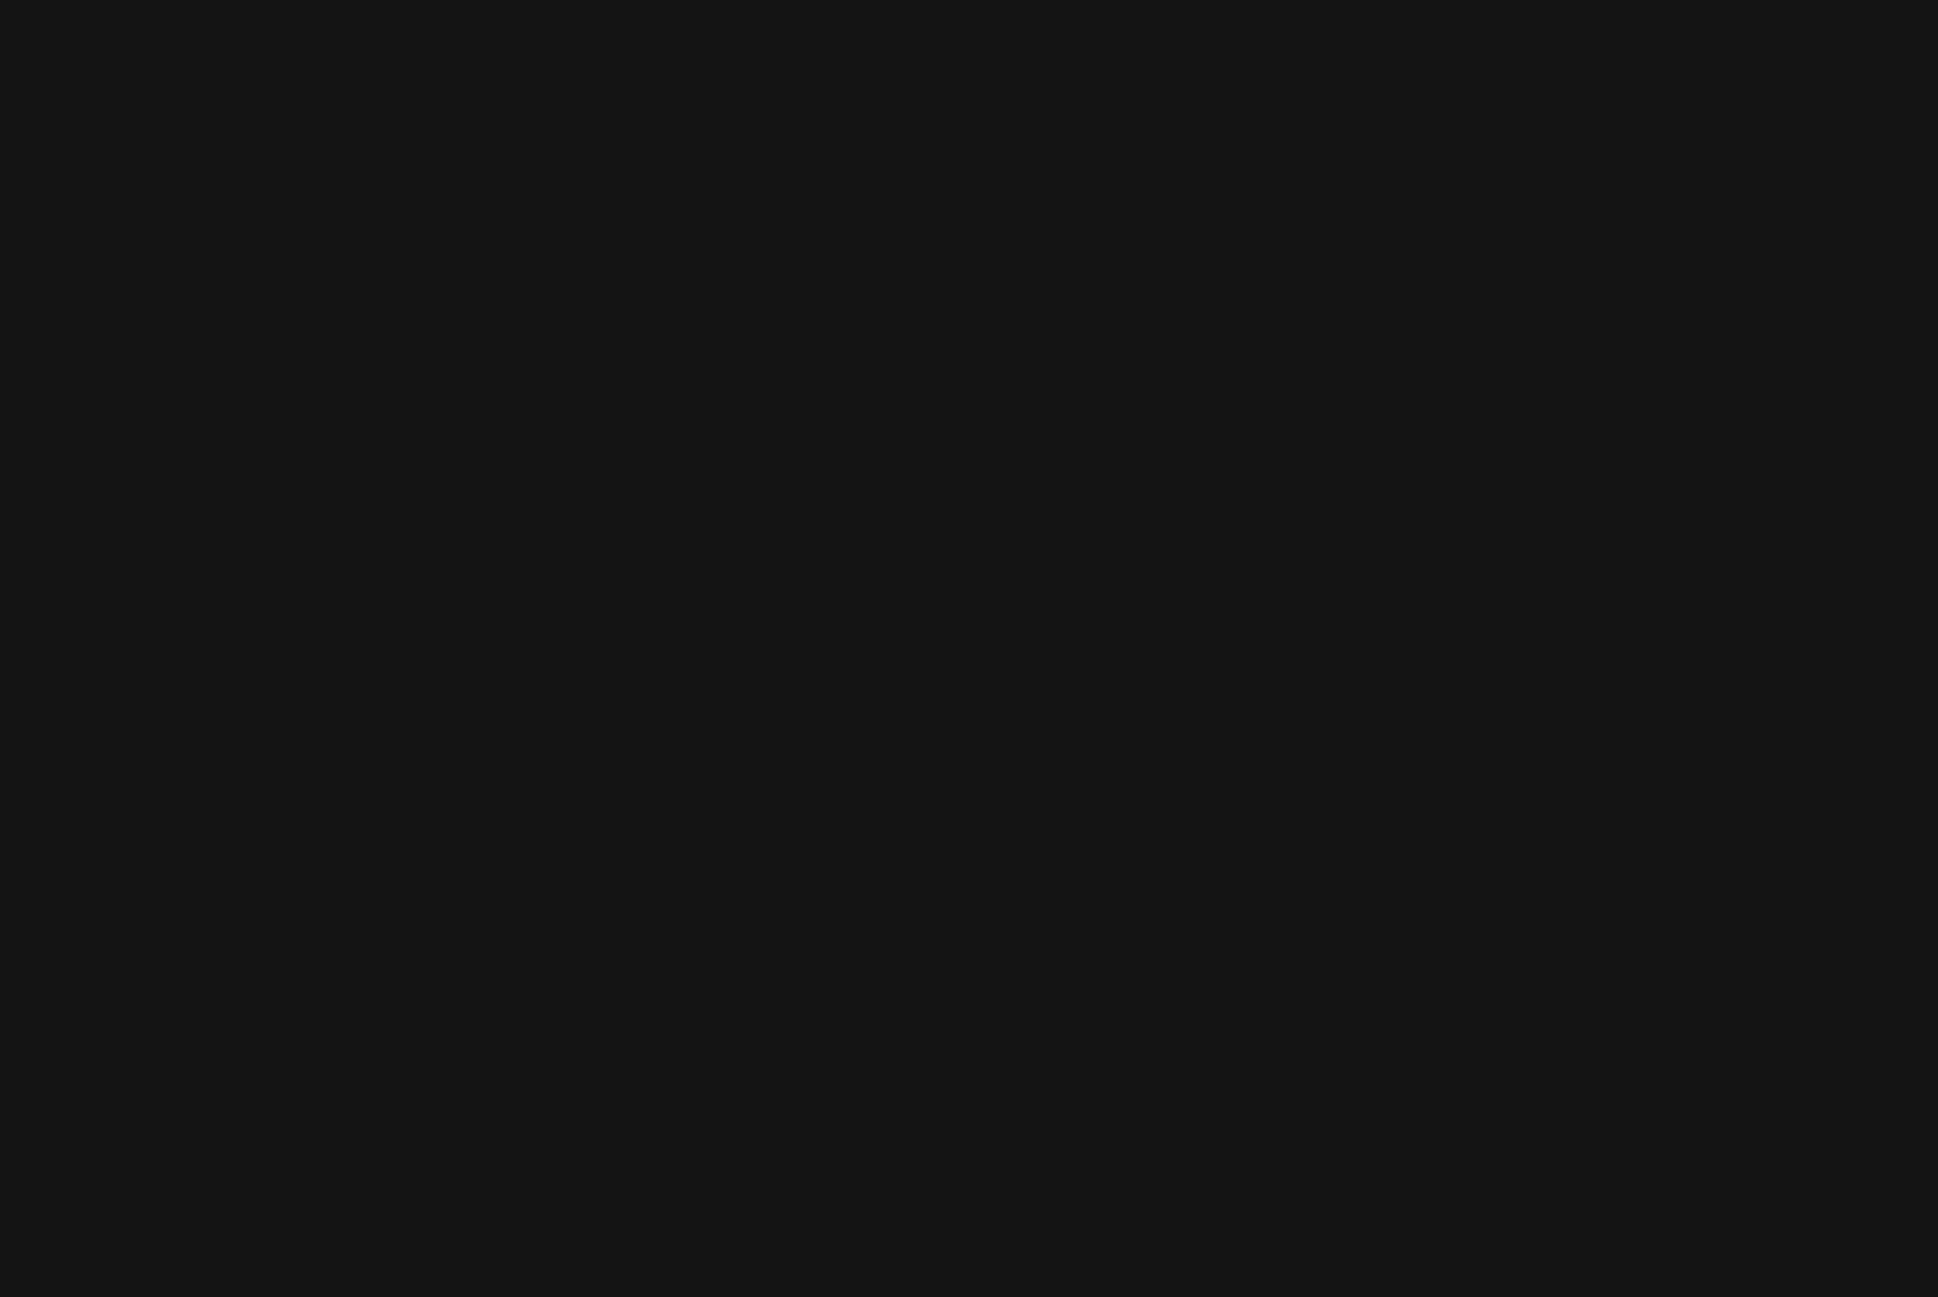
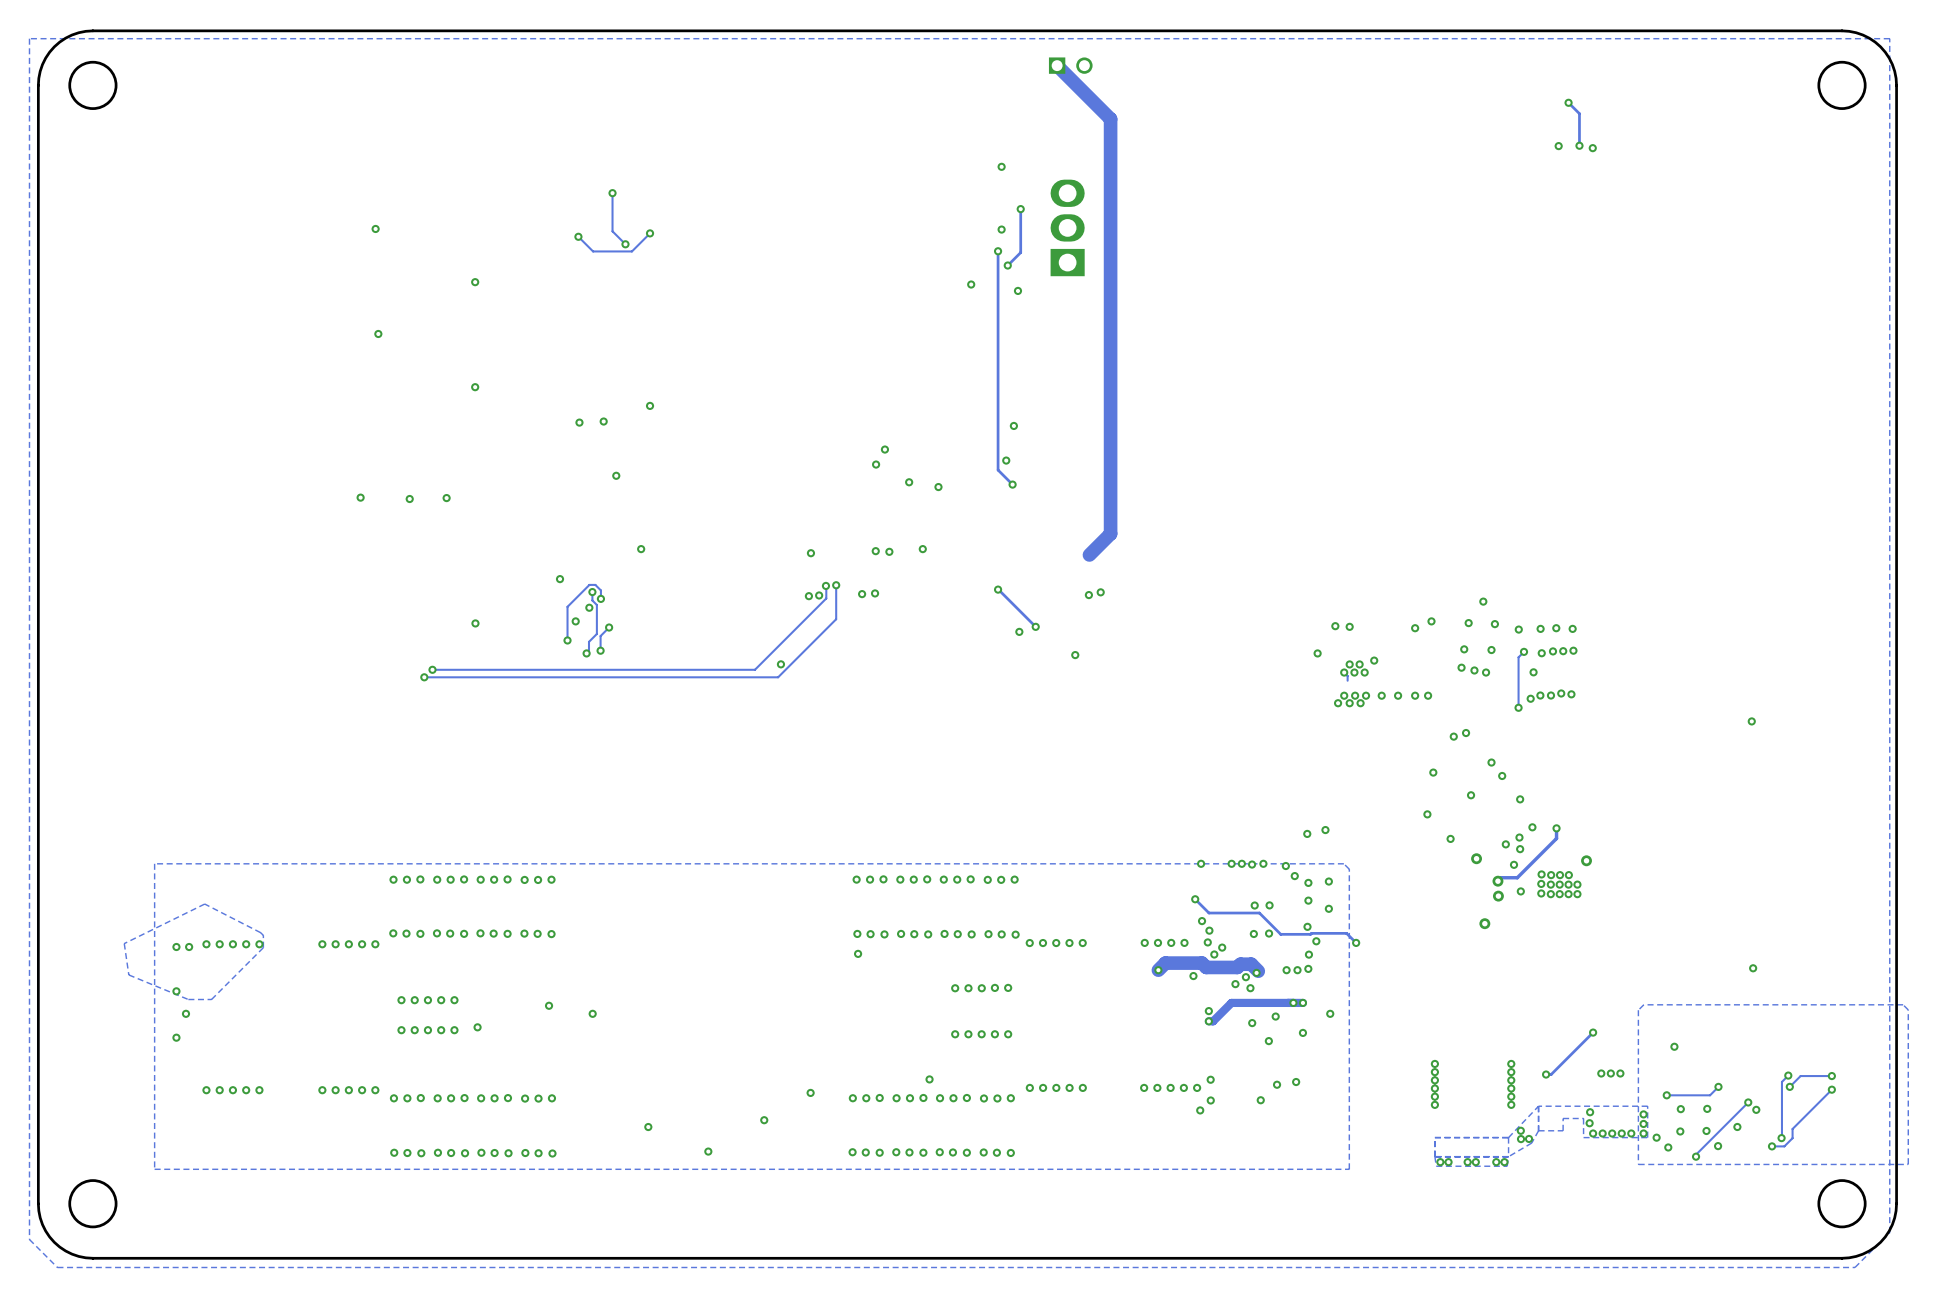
board edge: none -> (1842, 30) (92, 30) (72, 35) (59, 42) (45, 58) (40, 71) (38, 85) (38, 1203) (40, 1217) (49, 1236) (65, 1250) (78, 1256) (92, 1258) (1842, 1258) (1856, 1256) (1875, 1247) (1885, 1236) (1892, 1224) (1896, 1203) (1896, 85) (1892, 64) (1880, 46) (1862, 35) (1842, 30)
zone outline: none -> (1889, 38) (29, 38) (29, 1239) (57, 1267) (1854, 1267) (1889, 1232) (1889, 38)
round board edge: none -> [68, 60, 118, 110]
round board edge: none -> [1817, 60, 1867, 110]
track: none -> (1057, 65) (1110, 119) (1110, 533) (1089, 554)
part: none -> (1070, 65)
track: none -> (1568, 102) (1579, 113) (1579, 145)
via: none -> (1568, 102)
via: none -> (1579, 145)
via: none -> (1558, 146)
via: none -> (1592, 148)
via: none -> (1001, 166)
track: none -> (612, 193) (612, 231) (625, 244)
via: none -> (612, 193)
track: none -> (1020, 209) (1020, 252) (1007, 265)
via: none -> (1020, 209)
part: none -> (1067, 227)
via: none -> (375, 228)
via: none -> (1001, 229)
track: none -> (650, 233) (631, 251) (593, 251) (578, 236)
via: none -> (650, 233)
via: none -> (578, 236)
via: none -> (625, 244)
track: none -> (998, 251) (998, 470) (1012, 484)
via: none -> (998, 251)
via: none -> (1007, 265)
via: none -> (475, 282)
via: none -> (971, 284)
via: none -> (1017, 290)
via: none -> (378, 333)
via: none -> (475, 387)
via: none -> (650, 405)
via: none -> (603, 421)
via: none -> (579, 422)
via: none -> (1013, 425)
via: none -> (884, 449)
via: none -> (1006, 460)
via: none -> (876, 464)
via: none -> (616, 475)
via: none -> (909, 482)
via: none -> (1012, 484)
via: none -> (938, 487)
via: none -> (360, 497)
via: none -> (446, 498)
via: none -> (409, 499)
via: none -> (641, 549)
via: none -> (922, 549)
via: none -> (875, 551)
via: none -> (889, 551)
via: none -> (810, 553)
via: none -> (560, 579)
track: none -> (825, 585) (826, 598) (754, 669) (432, 669)
via: none -> (825, 585)
track: none -> (836, 585) (836, 619) (778, 677) (424, 677)
via: none -> (836, 585)
track: none -> (998, 589) (1035, 626)
via: none -> (998, 589)
track: none -> (592, 592) (592, 600) (596, 604) (596, 633) (588, 641) (588, 651) (586, 653)
via: none -> (592, 592)
via: none -> (1100, 592)
via: none -> (875, 593)
via: none -> (862, 594)
via: none -> (819, 595)
via: none -> (1088, 595)
via: none -> (808, 596)
track: none -> (600, 598) (600, 590) (595, 584) (589, 584) (567, 606) (567, 640)
via: none -> (600, 598)
via: none -> (1483, 601)
via: none -> (589, 607)
via: none -> (575, 621)
via: none -> (1431, 621)
via: none -> (475, 623)
via: none -> (1468, 623)
via: none -> (1494, 624)
via: none -> (1035, 626)
via: none -> (1335, 626)
via: none -> (1349, 626)
track: none -> (609, 627) (600, 636) (600, 650)
via: none -> (609, 627)
via: none -> (1415, 628)
via: none -> (1540, 628)
via: none -> (1556, 628)
via: none -> (1572, 628)
via: none -> (1518, 629)
via: none -> (1019, 631)
via: none -> (567, 640)
via: none -> (1464, 649)
via: none -> (600, 650)
via: none -> (1491, 650)
via: none -> (1573, 650)
track: none -> (1524, 651) (1518, 657) (1518, 707)
via: none -> (1524, 651)
via: none -> (1553, 651)
via: none -> (1563, 651)
via: none -> (586, 653)
via: none -> (1317, 653)
via: none -> (1541, 653)
via: none -> (1075, 655)
via: none -> (1374, 660)
via: none -> (780, 664)
via: none -> (1349, 664)
via: none -> (1359, 664)
via: none -> (1461, 667)
via: none -> (432, 669)
via: none -> (1474, 670)
track: none -> (1344, 672) (1347, 675) (1347, 680)
via: none -> (1344, 672)
via: none -> (1354, 672)
via: none -> (1364, 672)
via: none -> (1486, 672)
via: none -> (1533, 672)
via: none -> (424, 677)
via: none -> (1561, 693)
via: none -> (1571, 694)
via: none -> (1344, 695)
via: none -> (1355, 695)
via: none -> (1366, 695)
via: none -> (1381, 695)
via: none -> (1398, 695)
via: none -> (1415, 695)
via: none -> (1428, 695)
via: none -> (1540, 695)
via: none -> (1550, 695)
via: none -> (1530, 698)
via: none -> (1338, 703)
via: none -> (1349, 703)
via: none -> (1360, 703)
via: none -> (1518, 707)
via: none -> (1751, 721)
via: none -> (1466, 733)
via: none -> (1453, 736)
via: none -> (1491, 762)
via: none -> (1433, 772)
via: none -> (1502, 775)
via: none -> (1471, 795)
via: none -> (1520, 799)
via: none -> (1427, 814)
via: none -> (1532, 827)
track: none -> (1556, 828) (1556, 838) (1517, 877) (1501, 877) (1497, 881)
via: none -> (1556, 828)
via: none -> (1325, 830)
via: none -> (1307, 833)
via: none -> (1519, 837)
via: none -> (1450, 838)
via: none -> (1505, 844)
via: none -> (1520, 849)
via: none -> (1476, 858)
via: none -> (1586, 860)
via: none -> (1201, 863)
via: none -> (1231, 863)
via: none -> (1241, 863)
via: none -> (1263, 863)
zone outline: none -> (1343, 863) (154, 863) (154, 1169) (1349, 1169) (1349, 869) (1343, 863)
via: none -> (1252, 864)
via: none -> (1514, 864)
via: none -> (1285, 866)
via: none -> (1541, 874)
via: none -> (1551, 875)
via: none -> (1560, 875)
via: none -> (1568, 875)
via: none -> (1294, 876)
via: none -> (393, 879)
via: none -> (406, 879)
via: none -> (420, 879)
via: none -> (437, 879)
via: none -> (450, 879)
via: none -> (464, 879)
via: none -> (480, 879)
via: none -> (494, 879)
via: none -> (507, 879)
via: none -> (524, 879)
via: none -> (538, 879)
via: none -> (551, 879)
via: none -> (856, 879)
via: none -> (870, 879)
via: none -> (883, 879)
via: none -> (900, 879)
via: none -> (913, 879)
via: none -> (927, 879)
via: none -> (943, 879)
via: none -> (957, 879)
via: none -> (970, 879)
via: none -> (987, 879)
via: none -> (1001, 879)
via: none -> (1014, 879)
via: none -> (1328, 881)
via: none -> (1497, 881)
via: none -> (1308, 882)
via: none -> (1541, 883)
via: none -> (1550, 884)
via: none -> (1559, 884)
via: none -> (1568, 884)
via: none -> (1577, 884)
via: none -> (1520, 891)
via: none -> (1541, 893)
via: none -> (1550, 894)
via: none -> (1559, 894)
via: none -> (1568, 894)
via: none -> (1577, 894)
via: none -> (1498, 896)
track: none -> (1195, 899) (1208, 913) (1259, 913) (1280, 934) (1346, 933) (1356, 942)
via: none -> (1195, 899)
via: none -> (1308, 900)
zone outline: none -> (204, 904) (263, 935) (263, 947) (211, 999) (188, 999) (128, 974) (124, 943) (204, 904)
via: none -> (1254, 905)
via: none -> (1269, 905)
via: none -> (1328, 908)
via: none -> (1202, 921)
via: none -> (1484, 923)
via: none -> (1307, 926)
via: none -> (1209, 930)
via: none -> (393, 933)
via: none -> (406, 933)
via: none -> (420, 933)
via: none -> (437, 933)
via: none -> (450, 933)
via: none -> (464, 933)
via: none -> (480, 933)
via: none -> (493, 933)
via: none -> (507, 933)
via: none -> (524, 933)
via: none -> (537, 933)
via: none -> (857, 933)
via: none -> (901, 933)
via: none -> (944, 933)
via: none -> (1253, 933)
via: none -> (1269, 933)
via: none -> (551, 934)
via: none -> (870, 934)
via: none -> (884, 934)
via: none -> (914, 934)
via: none -> (928, 934)
via: none -> (957, 934)
via: none -> (971, 934)
via: none -> (988, 934)
via: none -> (1001, 934)
via: none -> (1015, 934)
via: none -> (1316, 941)
via: none -> (1144, 942)
via: none -> (1158, 942)
via: none -> (1171, 942)
via: none -> (1184, 942)
via: none -> (1207, 942)
via: none -> (1356, 942)
via: none -> (1029, 943)
via: none -> (1042, 943)
via: none -> (1056, 943)
via: none -> (1069, 943)
via: none -> (1082, 943)
via: none -> (206, 944)
via: none -> (219, 944)
via: none -> (232, 944)
via: none -> (246, 944)
via: none -> (259, 944)
via: none -> (322, 944)
via: none -> (335, 944)
via: none -> (348, 944)
via: none -> (362, 944)
via: none -> (375, 944)
via: none -> (176, 947)
via: none -> (189, 947)
via: none -> (1222, 947)
via: none -> (858, 953)
via: none -> (1214, 954)
via: none -> (1308, 954)
via: none -> (1308, 968)
via: none -> (1753, 968)
track: none -> (1158, 970) (1165, 963) (1201, 963) (1206, 967) (1237, 967) (1240, 964) (1251, 964) (1258, 971)
via: none -> (1158, 970)
via: none -> (1286, 970)
via: none -> (1297, 970)
via: none -> (1256, 972)
via: none -> (1193, 976)
via: none -> (1245, 977)
via: none -> (1235, 984)
via: none -> (994, 987)
via: none -> (1008, 987)
via: none -> (955, 988)
via: none -> (968, 988)
via: none -> (981, 988)
via: none -> (1250, 988)
via: none -> (176, 991)
via: none -> (401, 1000)
via: none -> (414, 1000)
via: none -> (427, 1000)
via: none -> (441, 1000)
via: none -> (454, 1000)
via: none -> (1293, 1002)
track: none -> (1302, 1002) (1231, 1002) (1213, 1021) (1208, 1021)
via: none -> (1302, 1002)
zone outline: none -> (1903, 1004) (1643, 1004) (1638, 1010) (1638, 1164) (1908, 1164) (1908, 1009) (1903, 1004)
via: none -> (549, 1005)
via: none -> (1208, 1011)
via: none -> (185, 1013)
via: none -> (592, 1013)
via: none -> (1330, 1013)
via: none -> (1275, 1016)
via: none -> (1208, 1021)
via: none -> (1252, 1023)
via: none -> (477, 1027)
via: none -> (401, 1030)
via: none -> (414, 1030)
via: none -> (427, 1030)
via: none -> (441, 1030)
via: none -> (454, 1030)
via: none -> (1302, 1032)
track: none -> (1593, 1032) (1551, 1074) (1546, 1074)
via: none -> (1593, 1032)
via: none -> (955, 1034)
via: none -> (968, 1034)
via: none -> (981, 1034)
via: none -> (994, 1034)
via: none -> (1008, 1034)
via: none -> (176, 1037)
via: none -> (1268, 1041)
via: none -> (1674, 1046)
via: none -> (1434, 1063)
via: none -> (1511, 1063)
via: none -> (1434, 1072)
via: none -> (1511, 1072)
via: none -> (1601, 1073)
via: none -> (1610, 1073)
via: none -> (1620, 1073)
via: none -> (1546, 1074)
track: none -> (1788, 1075) (1781, 1081) (1781, 1138)
via: none -> (1788, 1075)
track: none -> (1831, 1076) (1800, 1076) (1789, 1086)
via: none -> (1831, 1076)
via: none -> (929, 1079)
via: none -> (1210, 1079)
via: none -> (1434, 1080)
via: none -> (1511, 1080)
via: none -> (1296, 1082)
via: none -> (1277, 1084)
track: none -> (1718, 1086) (1710, 1095) (1666, 1095)
via: none -> (1718, 1086)
via: none -> (1789, 1086)
via: none -> (1029, 1087)
via: none -> (1043, 1087)
via: none -> (1056, 1087)
via: none -> (1069, 1087)
via: none -> (1082, 1087)
via: none -> (1144, 1087)
via: none -> (1157, 1087)
via: none -> (1170, 1087)
via: none -> (1183, 1087)
via: none -> (1197, 1087)
via: none -> (1434, 1088)
via: none -> (1511, 1088)
track: none -> (1831, 1089) (1792, 1128) (1792, 1138) (1784, 1146) (1772, 1146)
via: none -> (1831, 1089)
via: none -> (206, 1090)
via: none -> (219, 1090)
via: none -> (232, 1090)
via: none -> (246, 1090)
via: none -> (259, 1090)
via: none -> (322, 1090)
via: none -> (335, 1090)
via: none -> (348, 1090)
via: none -> (362, 1090)
via: none -> (375, 1090)
via: none -> (810, 1092)
via: none -> (1666, 1095)
via: none -> (1434, 1096)
via: none -> (1511, 1096)
via: none -> (879, 1097)
via: none -> (923, 1097)
via: none -> (966, 1097)
via: none -> (393, 1098)
via: none -> (407, 1098)
via: none -> (420, 1098)
via: none -> (437, 1098)
via: none -> (451, 1098)
via: none -> (464, 1098)
via: none -> (481, 1098)
via: none -> (494, 1098)
via: none -> (507, 1098)
via: none -> (525, 1098)
via: none -> (538, 1098)
via: none -> (551, 1098)
via: none -> (852, 1098)
via: none -> (866, 1098)
via: none -> (896, 1098)
via: none -> (910, 1098)
via: none -> (940, 1098)
via: none -> (953, 1098)
via: none -> (983, 1098)
via: none -> (997, 1098)
via: none -> (1010, 1098)
via: none -> (1210, 1100)
via: none -> (1260, 1100)
track: none -> (1748, 1102) (1696, 1156)
via: none -> (1748, 1102)
via: none -> (1434, 1104)
via: none -> (1511, 1104)
zone outline: none -> (1538, 1106) (1538, 1130)
zone outline: none -> (1538, 1106) (1647, 1106) (1647, 1137) (1583, 1137) (1583, 1118) (1563, 1118) (1563, 1130) (1538, 1130)
zone outline: none -> (1538, 1106) (1508, 1137)
via: none -> (1707, 1108)
via: none -> (1680, 1109)
via: none -> (1756, 1109)
via: none -> (1200, 1110)
via: none -> (1590, 1112)
via: none -> (1643, 1114)
via: none -> (764, 1120)
via: none -> (1589, 1123)
via: none -> (1643, 1123)
via: none -> (1737, 1126)
via: none -> (648, 1127)
via: none -> (1520, 1130)
zone outline: none -> (1538, 1130) (1531, 1143) (1508, 1156)
via: none -> (1706, 1130)
via: none -> (1680, 1131)
via: none -> (1593, 1133)
via: none -> (1602, 1133)
via: none -> (1612, 1133)
via: none -> (1621, 1133)
via: none -> (1631, 1133)
via: none -> (1643, 1133)
zone outline: none -> (1508, 1137) (1434, 1137) (1434, 1156)
zone outline: none -> (1508, 1137) (1508, 1156)
via: none -> (1656, 1137)
via: none -> (1529, 1138)
via: none -> (1781, 1138)
via: none -> (1521, 1139)
via: none -> (1718, 1146)
via: none -> (1772, 1146)
via: none -> (1668, 1147)
via: none -> (708, 1151)
via: none -> (394, 1152)
via: none -> (437, 1152)
via: none -> (481, 1152)
via: none -> (852, 1152)
via: none -> (865, 1152)
via: none -> (879, 1152)
via: none -> (896, 1152)
via: none -> (909, 1152)
via: none -> (923, 1152)
via: none -> (939, 1152)
via: none -> (952, 1152)
via: none -> (966, 1152)
via: none -> (983, 1152)
via: none -> (996, 1152)
via: none -> (1010, 1152)
via: none -> (407, 1153)
via: none -> (421, 1153)
via: none -> (451, 1153)
via: none -> (465, 1153)
via: none -> (494, 1153)
via: none -> (508, 1153)
via: none -> (525, 1153)
via: none -> (538, 1153)
via: none -> (552, 1153)
zone outline: none -> (1508, 1156) (1507, 1166) (1436, 1166) (1434, 1156)
zone outline: none -> (1508, 1156) (1434, 1156)
via: none -> (1696, 1156)
via: none -> (1440, 1162)
via: none -> (1448, 1162)
via: none -> (1467, 1162)
via: none -> (1475, 1162)
via: none -> (1496, 1162)
via: none -> (1504, 1162)
round board edge: none -> [68, 1179, 118, 1229]
round board edge: none -> [1817, 1179, 1867, 1229]

